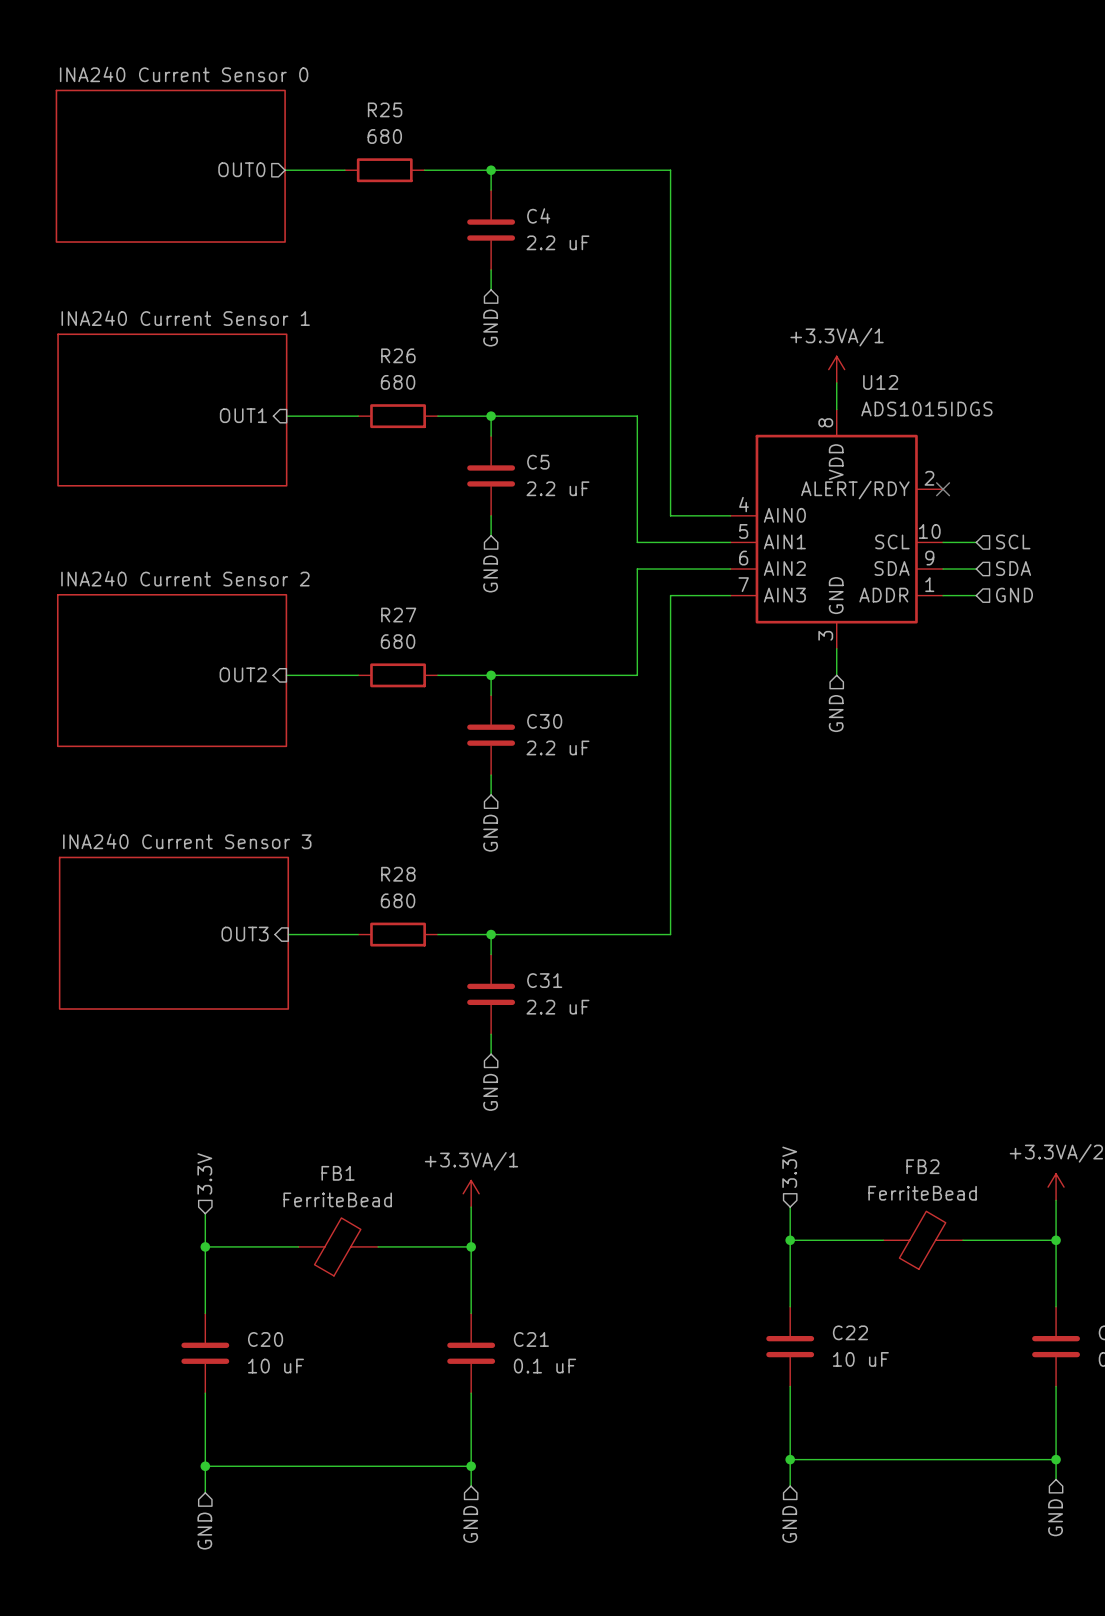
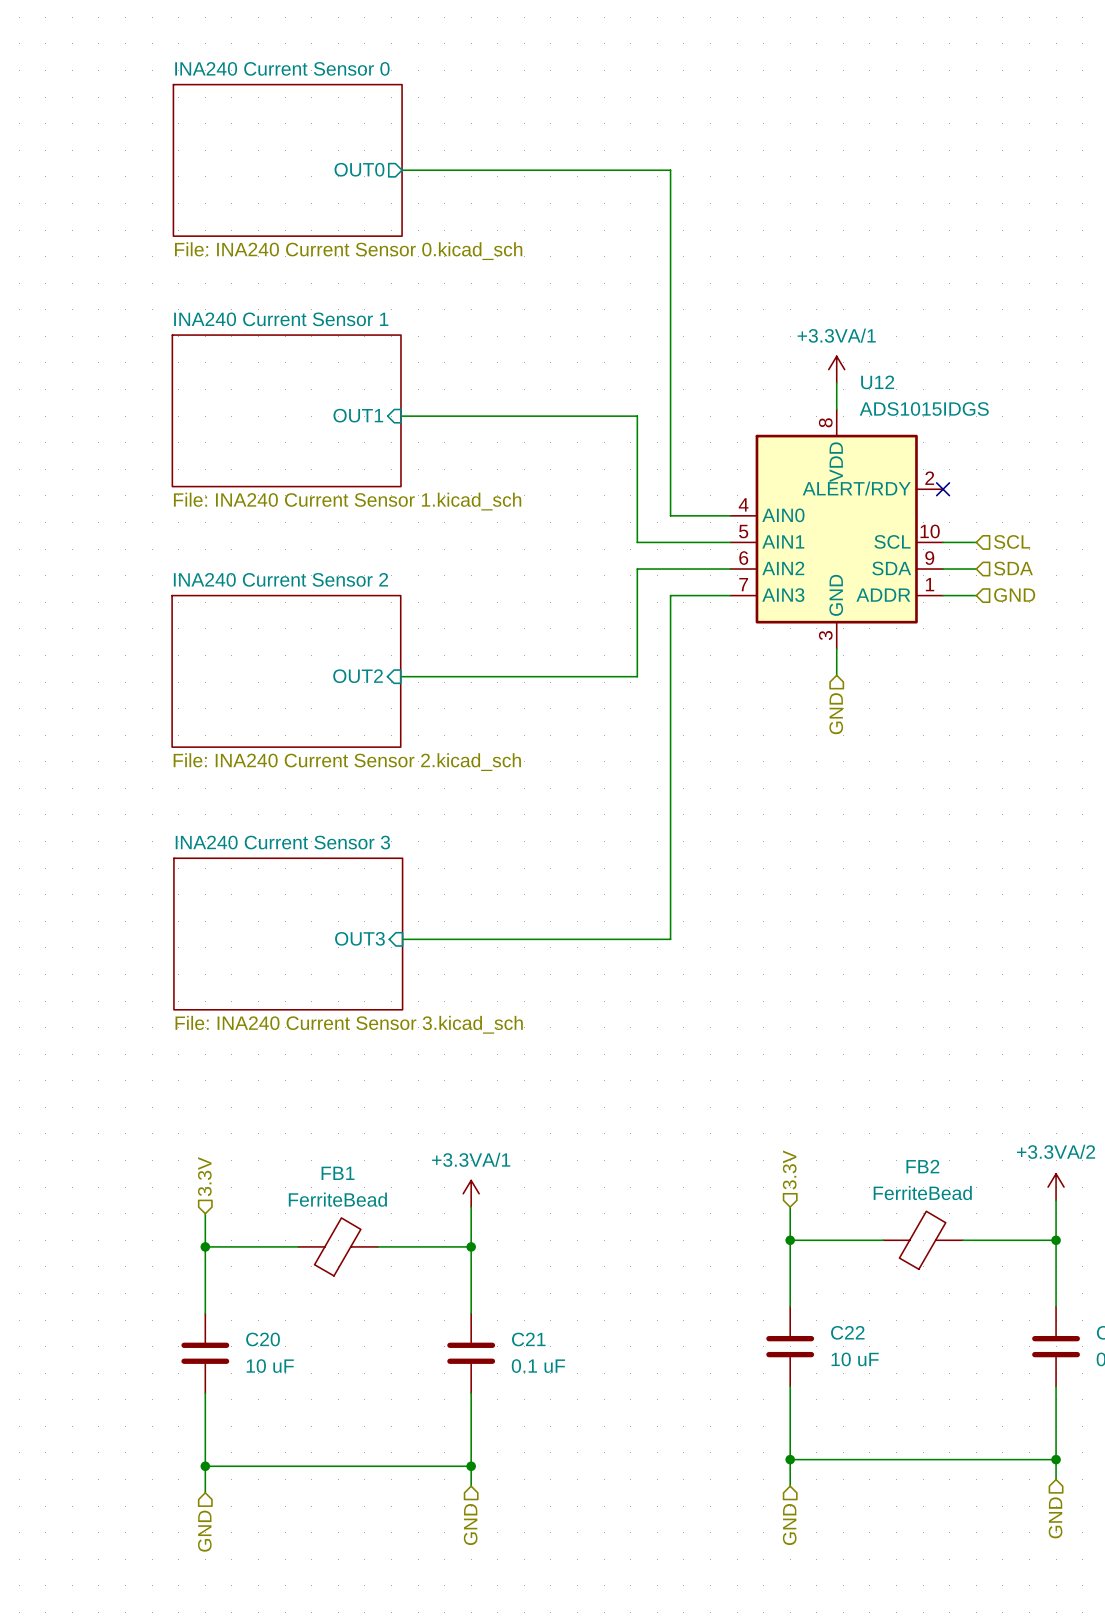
sheet INA240 Current Sensor 0 position: (170, 166) -> (287, 160)
sheet pin position: OUT0 (241, 169) -> OUT0 (359, 169)
wire: (285, 170) (344, 170) -> none
R25: 680 (384, 170) -> none
wire: (491, 170) (491, 190) -> none
junction: (491, 170) -> none
C4: 2.2 uF (491, 230) -> none
sheet INA240 Current Sensor 0 value: none -> File: INA240 Current Sensor 0.kicad_sch (348, 251)
wire: (491, 269) (491, 289) -> none
hierarchical label: GND (490, 328) -> none
sheet INA240 Current Sensor 1 position: (172, 410) -> (286, 410)
sheet pin position: OUT1 (243, 415) -> OUT1 (358, 415)
wire: (286, 416) (358, 416) -> none
R26: 680 (398, 416) -> none
wire: none -> (400, 416) (437, 416)
wire: (491, 416) (491, 436) -> none
junction: (491, 416) -> none
C5: 2.2 uF (491, 475) -> none
sheet INA240 Current Sensor 1 value: none -> File: INA240 Current Sensor 1.kicad_sch (347, 501)
wire: (491, 515) (491, 535) -> none
hierarchical label: GND (490, 573) -> none
sheet INA240 Current Sensor 2 position: (172, 670) -> (286, 671)
sheet pin position: OUT2 (243, 674) -> OUT2 (358, 676)
wire: (286, 675) (358, 675) -> none
R27: 680 (398, 675) -> none
wire: (437, 675) (637, 675) -> (400, 676) (637, 675)
wire: (491, 675) (491, 695) -> none
junction: (491, 675) -> none
C30: 2.2 uF (491, 735) -> none
sheet INA240 Current Sensor 2 value: none -> File: INA240 Current Sensor 2.kicad_sch (347, 762)
wire: (491, 775) (491, 794) -> none
hierarchical label: GND (490, 833) -> none
sheet INA240 Current Sensor 3 position: (173, 933) -> (288, 934)
sheet pin position: OUT3 (245, 934) -> OUT3 (359, 938)
wire: (288, 934) (358, 934) -> none
R28: 680 (398, 934) -> none
wire: (437, 934) (670, 934) -> (402, 939) (670, 939) (670, 934)
wire: (491, 934) (491, 954) -> none
junction: (491, 934) -> none
C31: 2.2 uF (491, 994) -> none
sheet INA240 Current Sensor 3 value: none -> File: INA240 Current Sensor 3.kicad_sch (349, 1024)
wire: (491, 1034) (491, 1054) -> none
hierarchical label: GND (490, 1092) -> none

